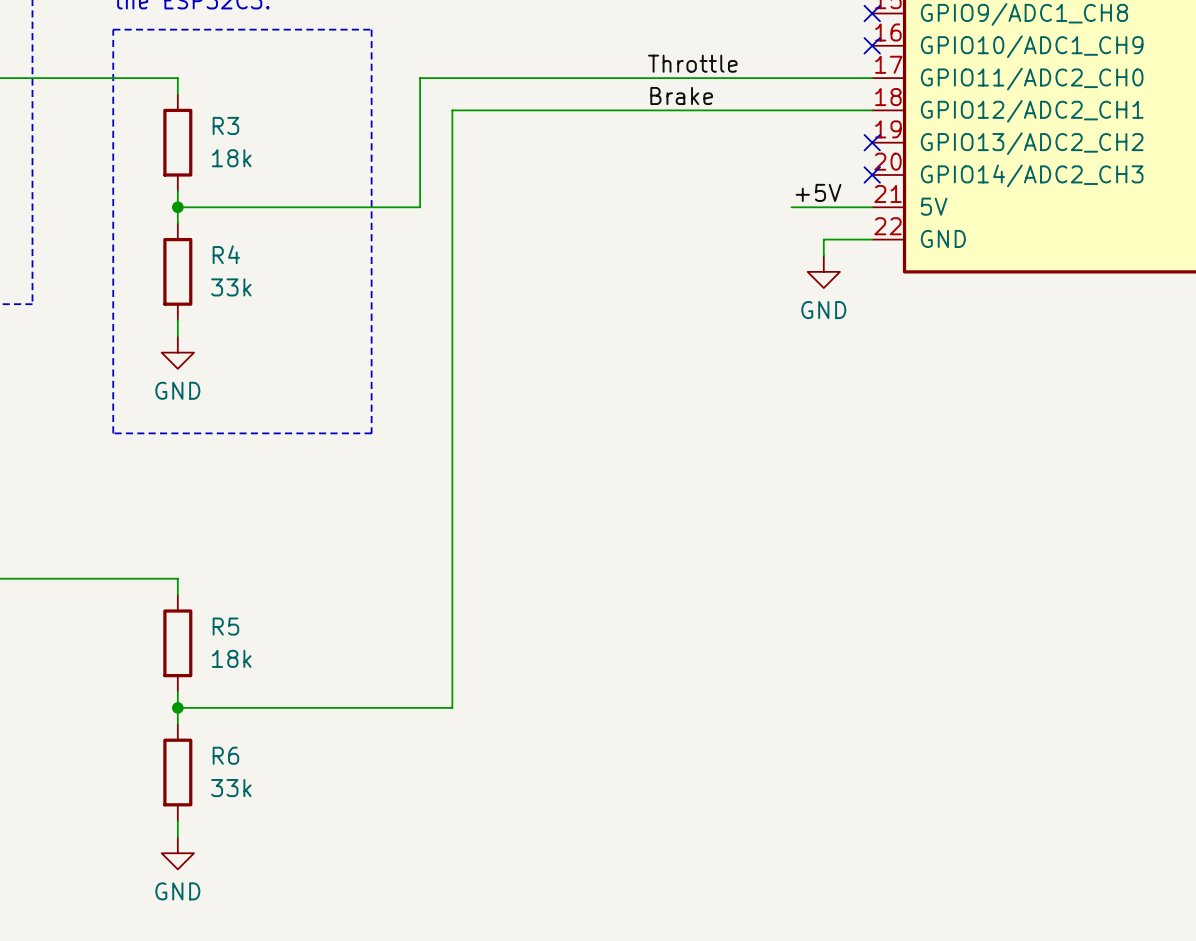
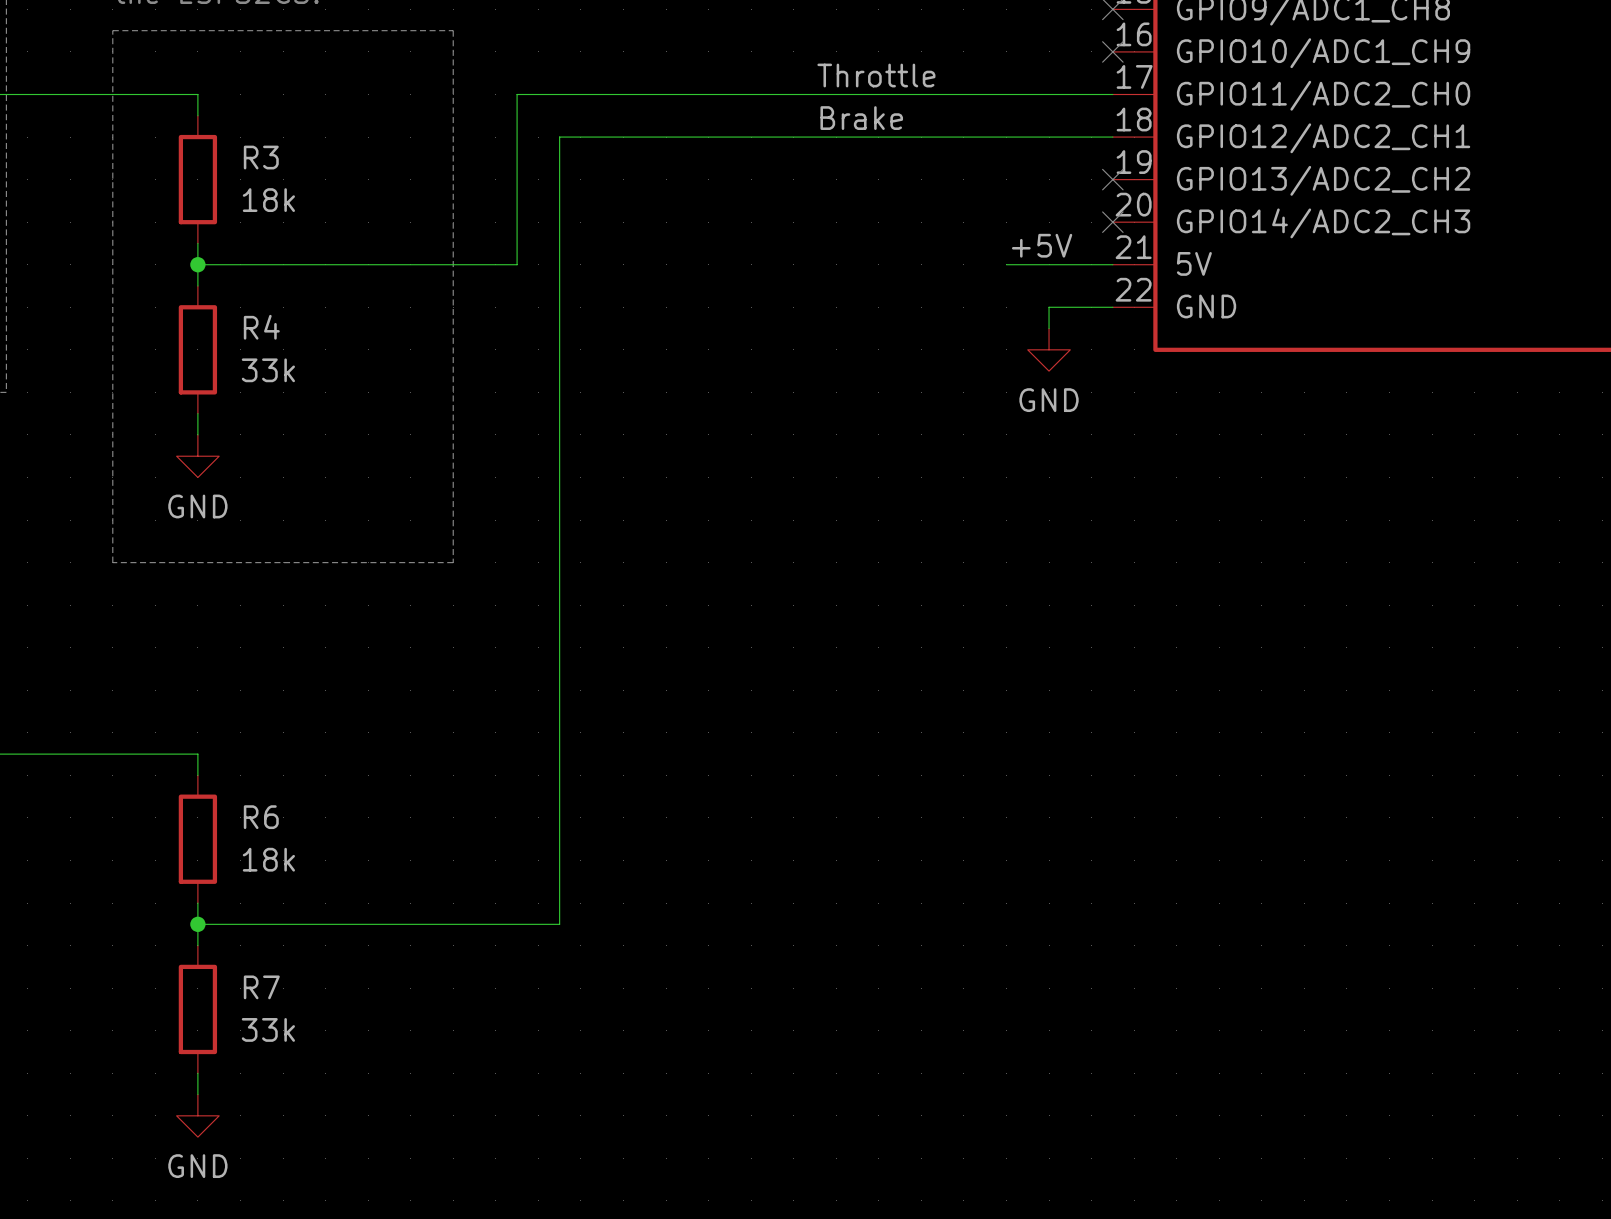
R5 name: R5 (225, 626) -> R6 (261, 817)
R6 name: R6 (225, 755) -> R7 (261, 987)

